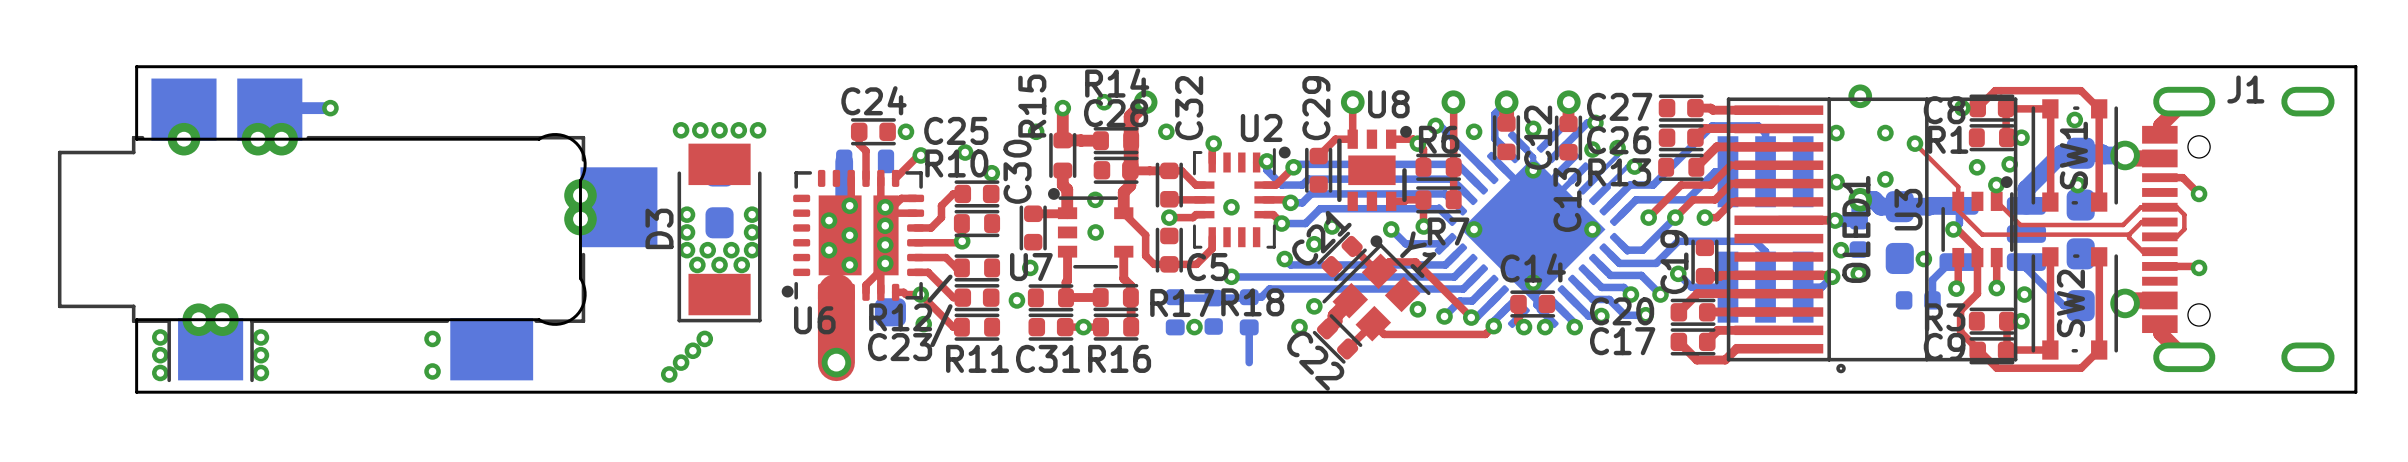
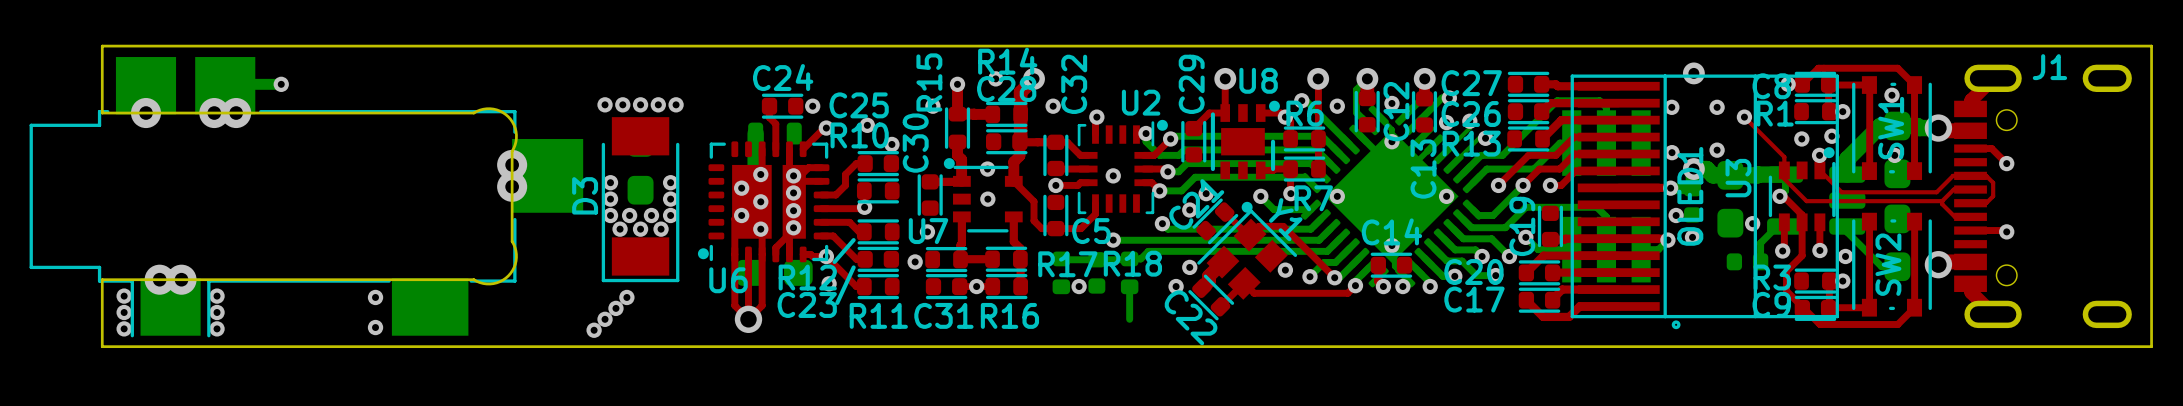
top track: none -> (751, 201) (734, 218) (734, 305) (748, 319) (762, 305) (762, 212) (751, 201)
top track width: thick (836, 292) (836, 362) -> thin (748, 254) (748, 319)

